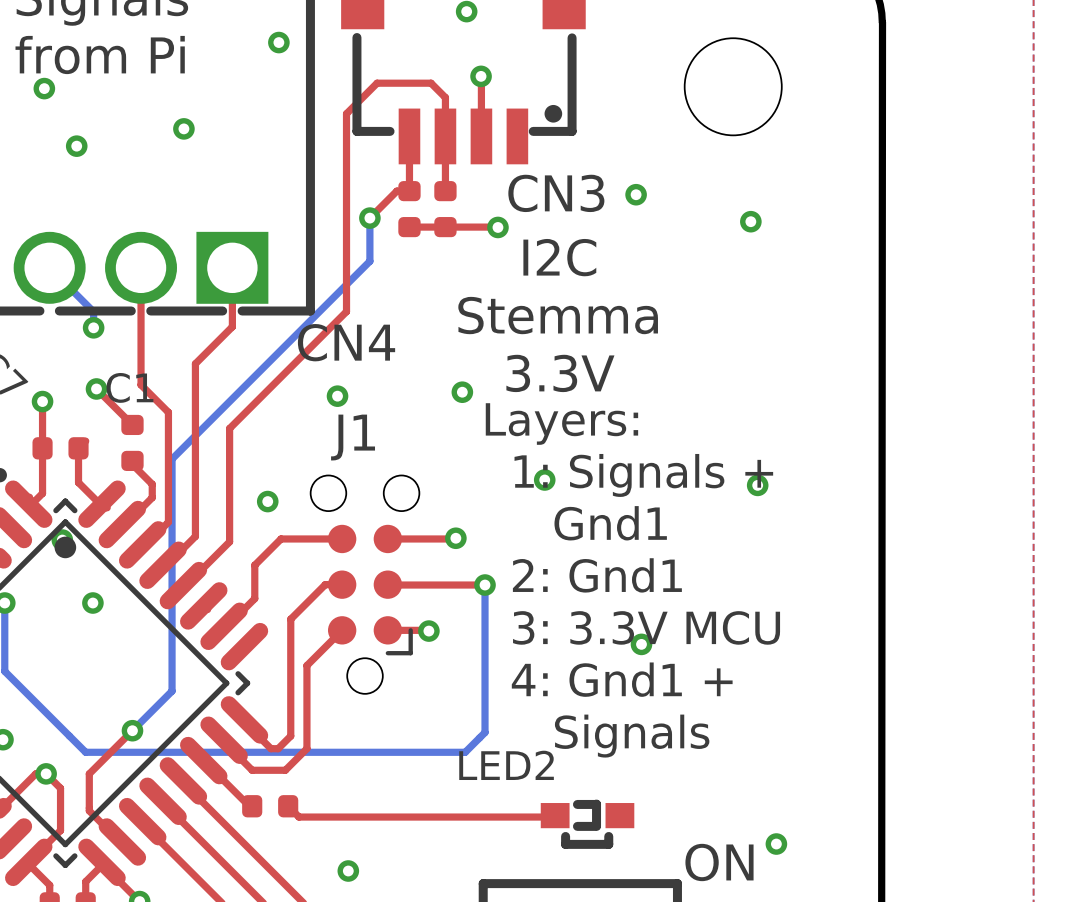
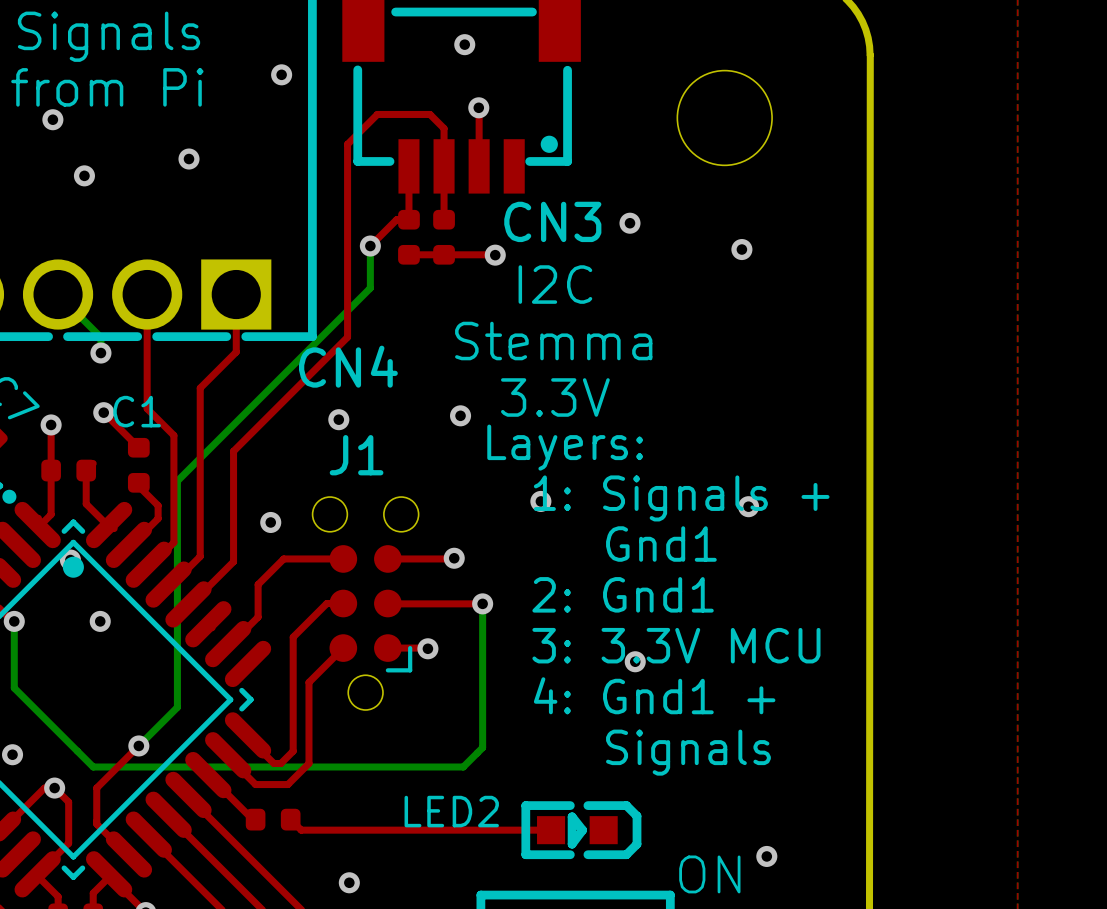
LED2 footprint: [540, 799, 635, 849] -> [521, 801, 642, 860]

